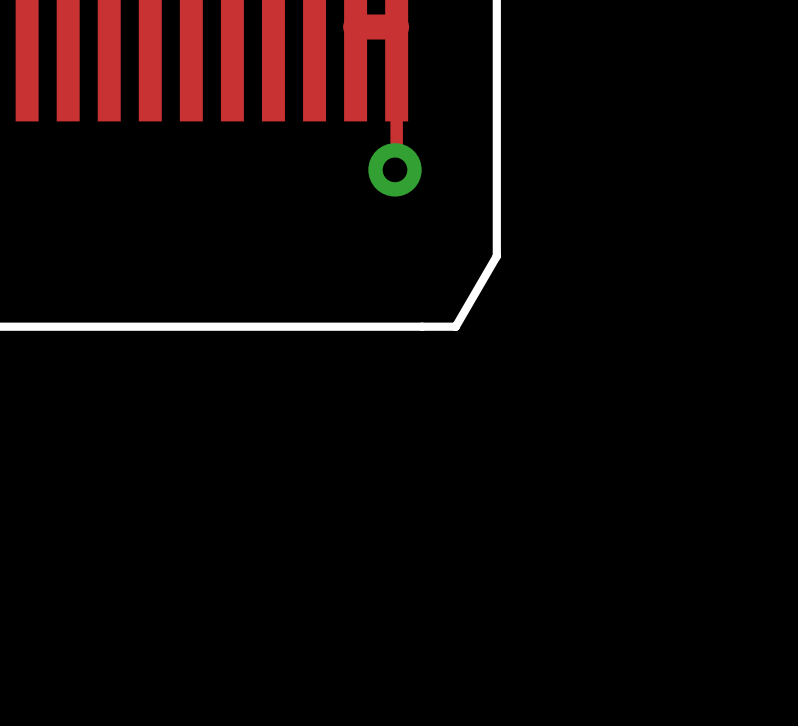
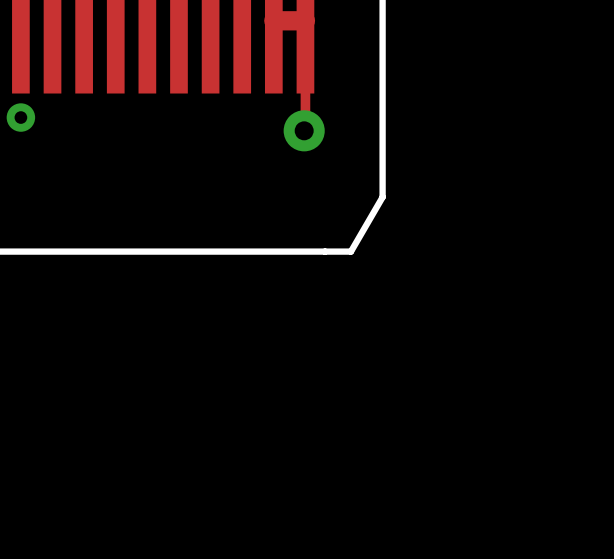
via: none -> (20, 117)

